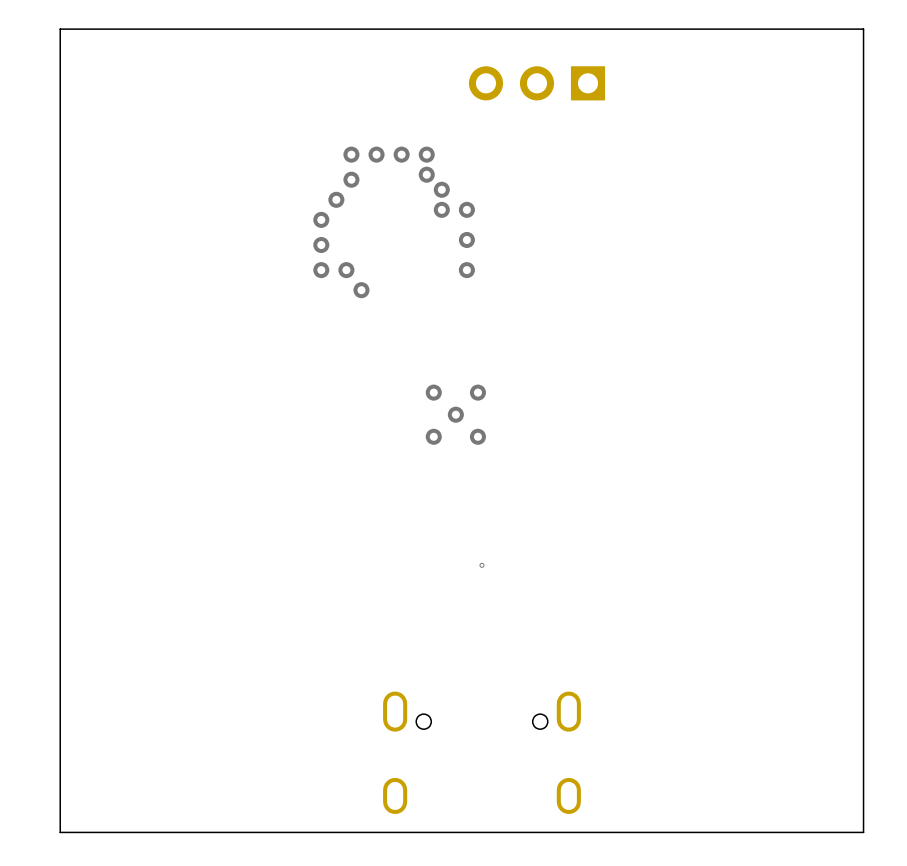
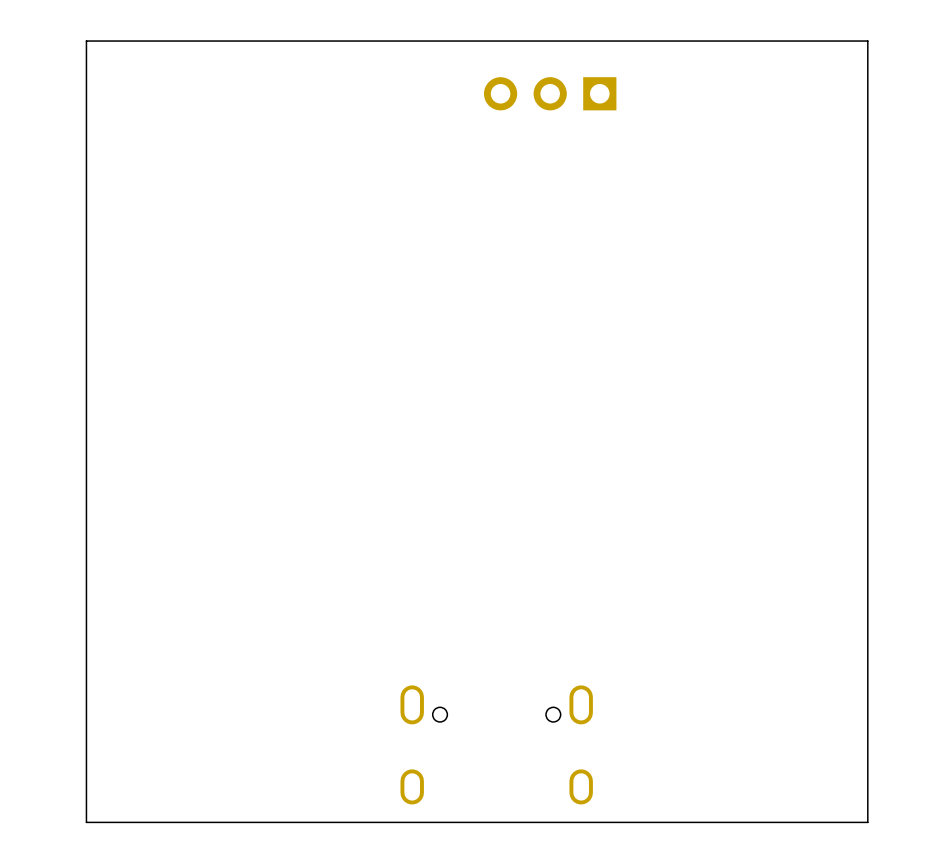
via: (351, 154) -> none
via: (376, 154) -> none
via: (401, 154) -> none
via: (426, 154) -> none
via: (426, 174) -> none
via: (351, 179) -> none
via: (441, 189) -> none
via: (336, 199) -> none
via: (441, 209) -> none
via: (466, 209) -> none
via: (321, 219) -> none
via: (466, 239) -> none
via: (321, 245) -> none
via: (321, 270) -> none
via: (346, 270) -> none
via: (466, 270) -> none
via: (361, 290) -> none
via: (433, 392) -> none
via: (477, 392) -> none
via: (455, 414) -> none
via: (433, 436) -> none
via: (477, 436) -> none
via: (481, 565) -> none

